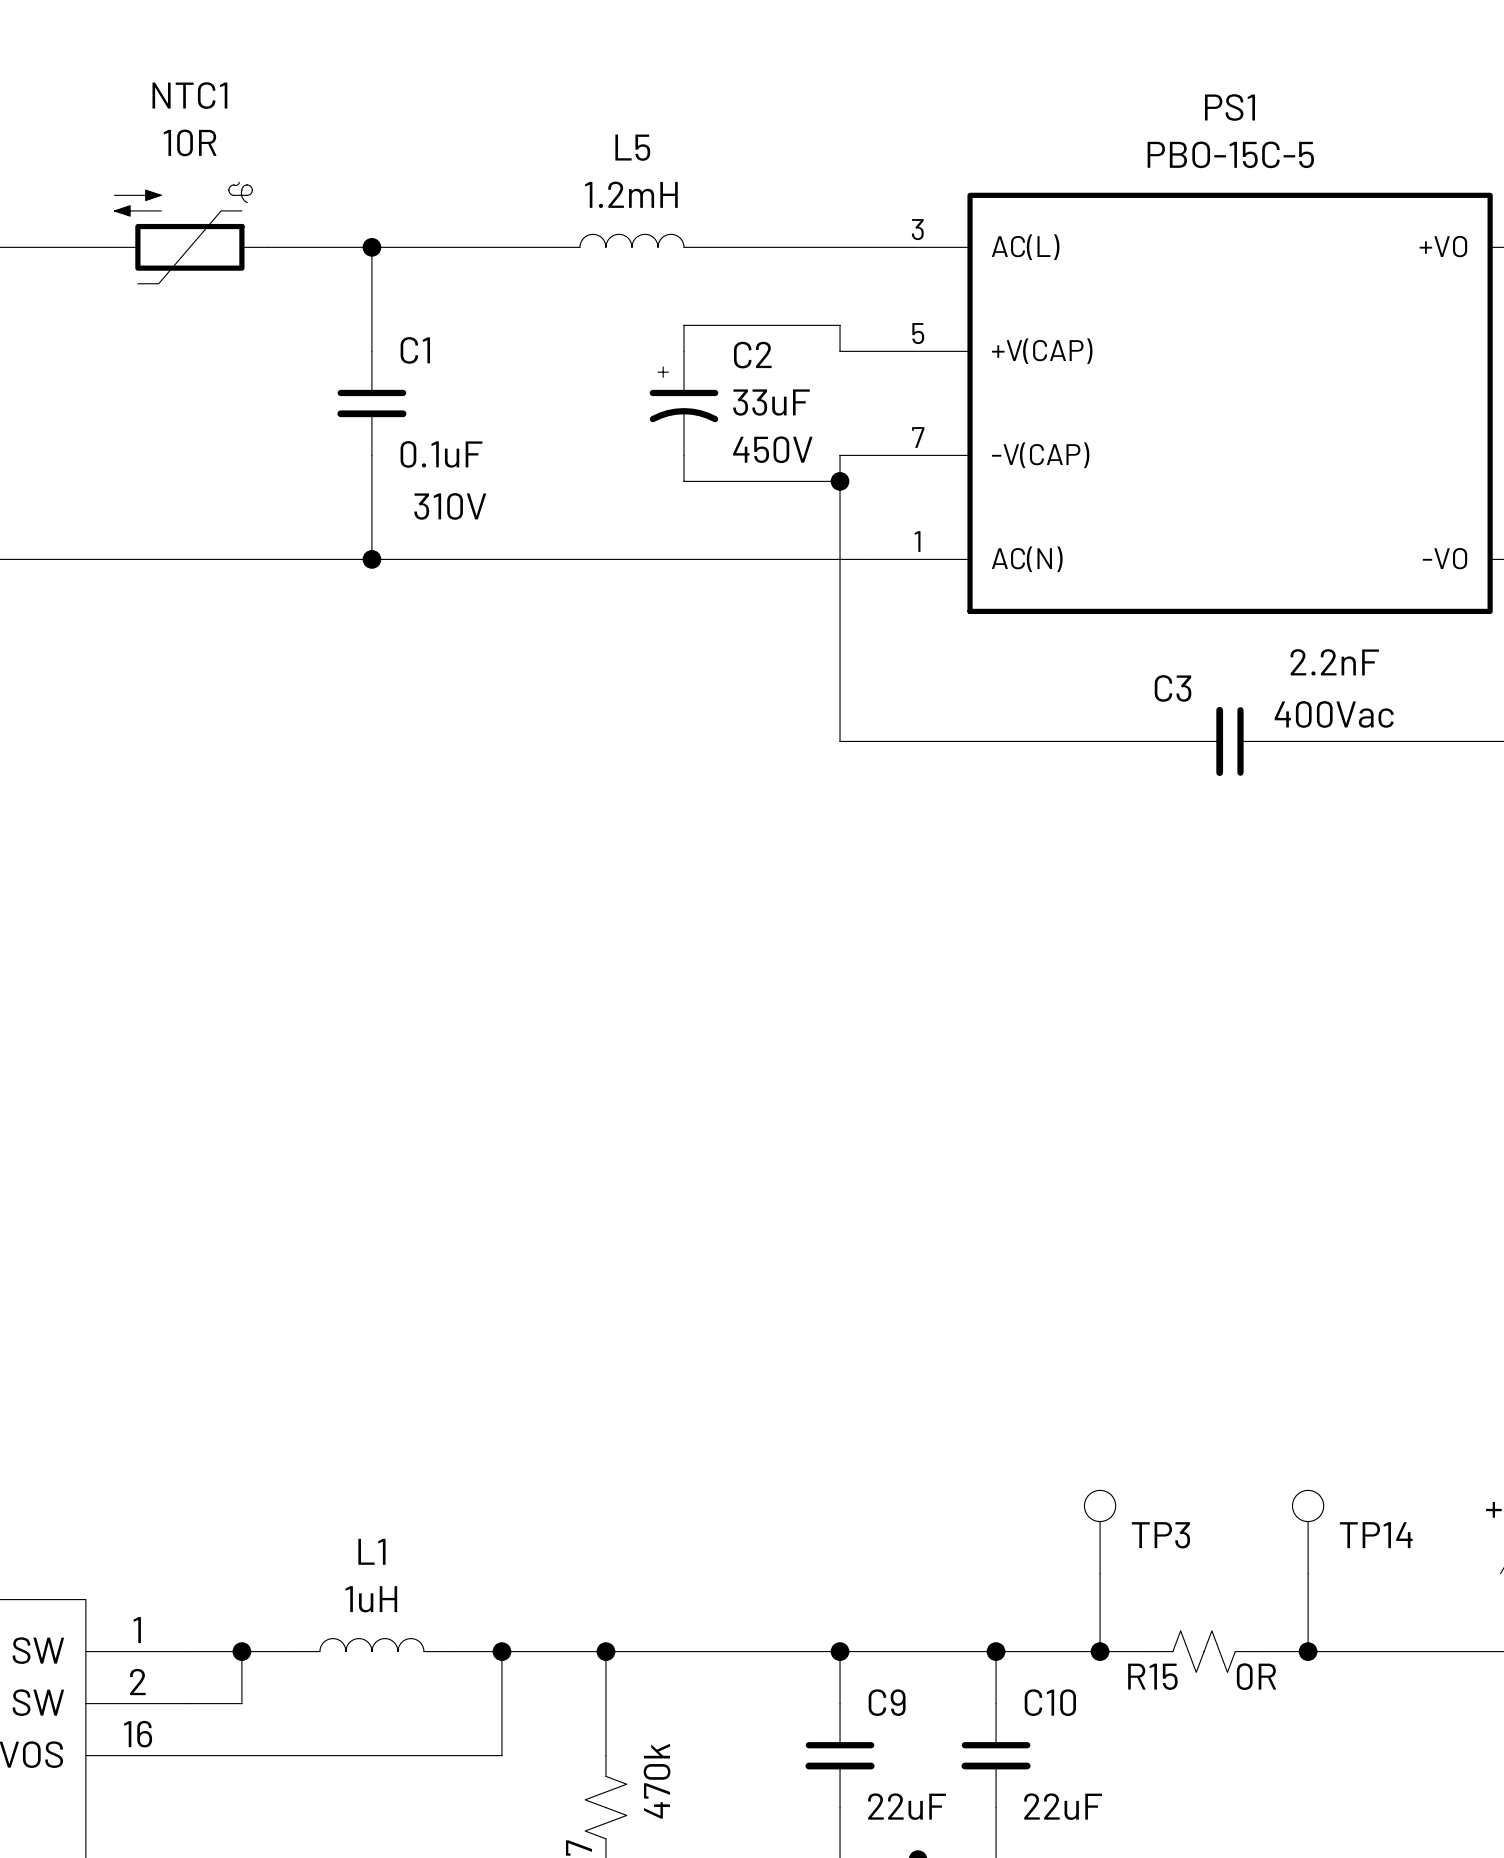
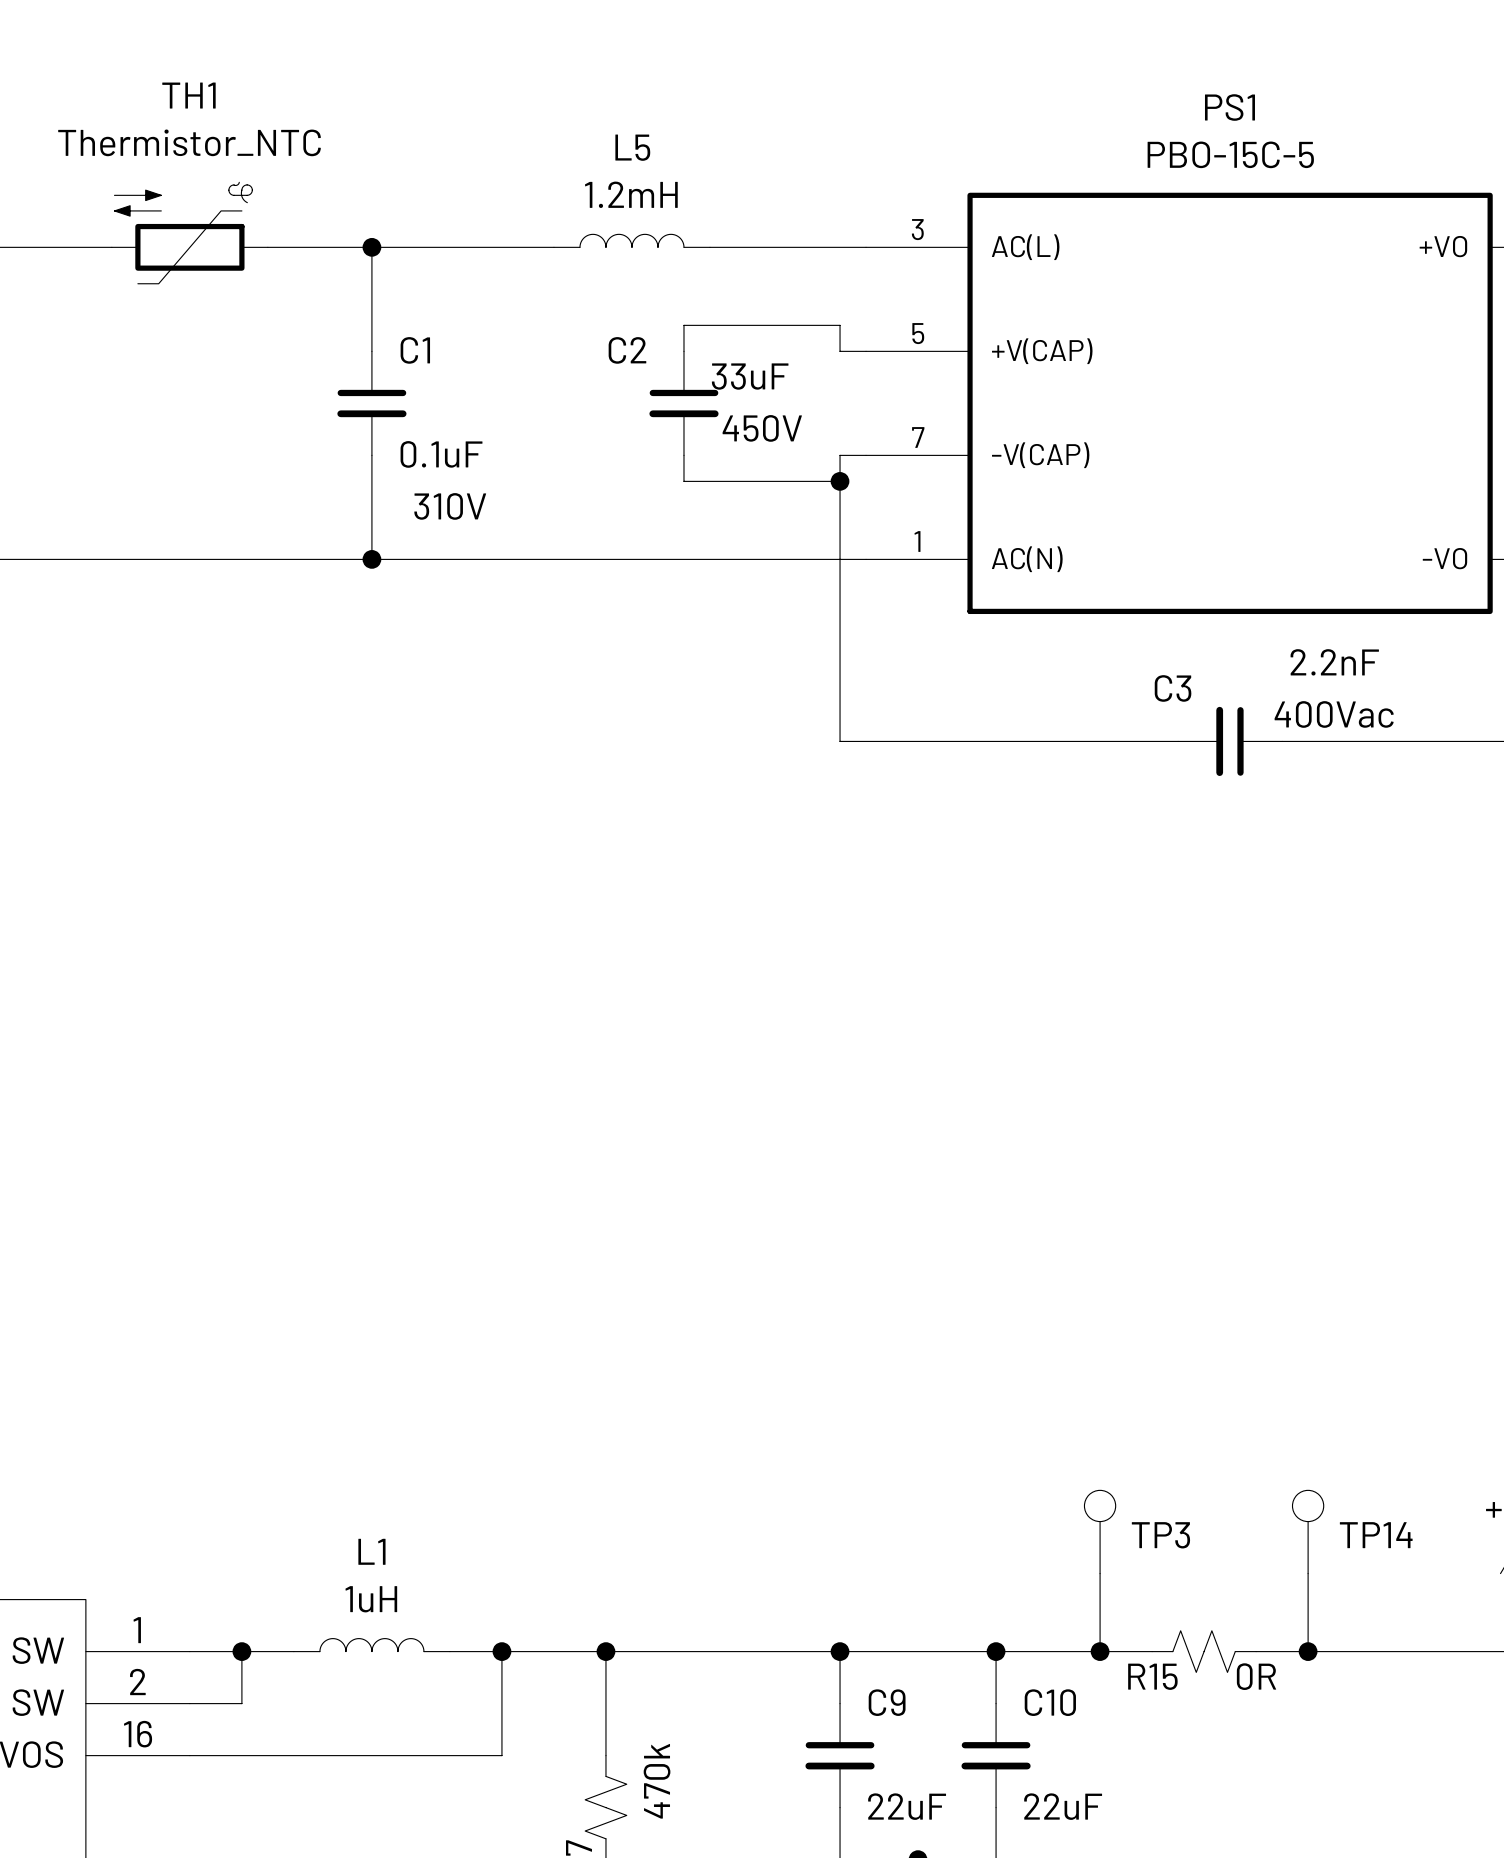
NTC1 name: NTC1 (189, 95) -> TH1 (188, 95)
NTC1 value: 10R (190, 142) -> Thermistor_NTC (189, 142)
C2 symbol: [649, 351, 719, 456] -> [649, 351, 719, 456]
C2 name position: C2 (752, 355) -> C2 (627, 350)

